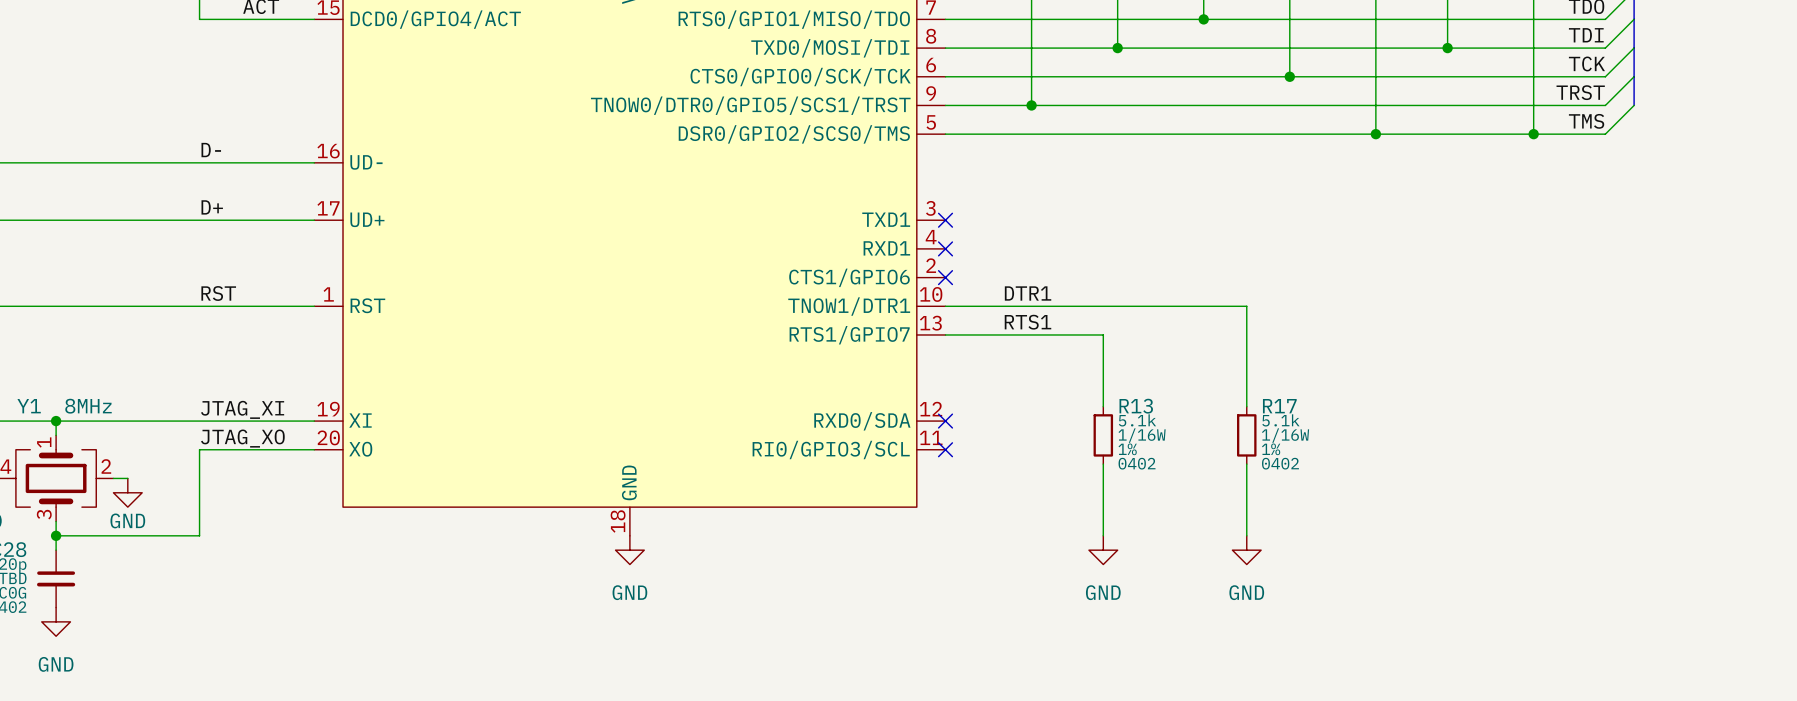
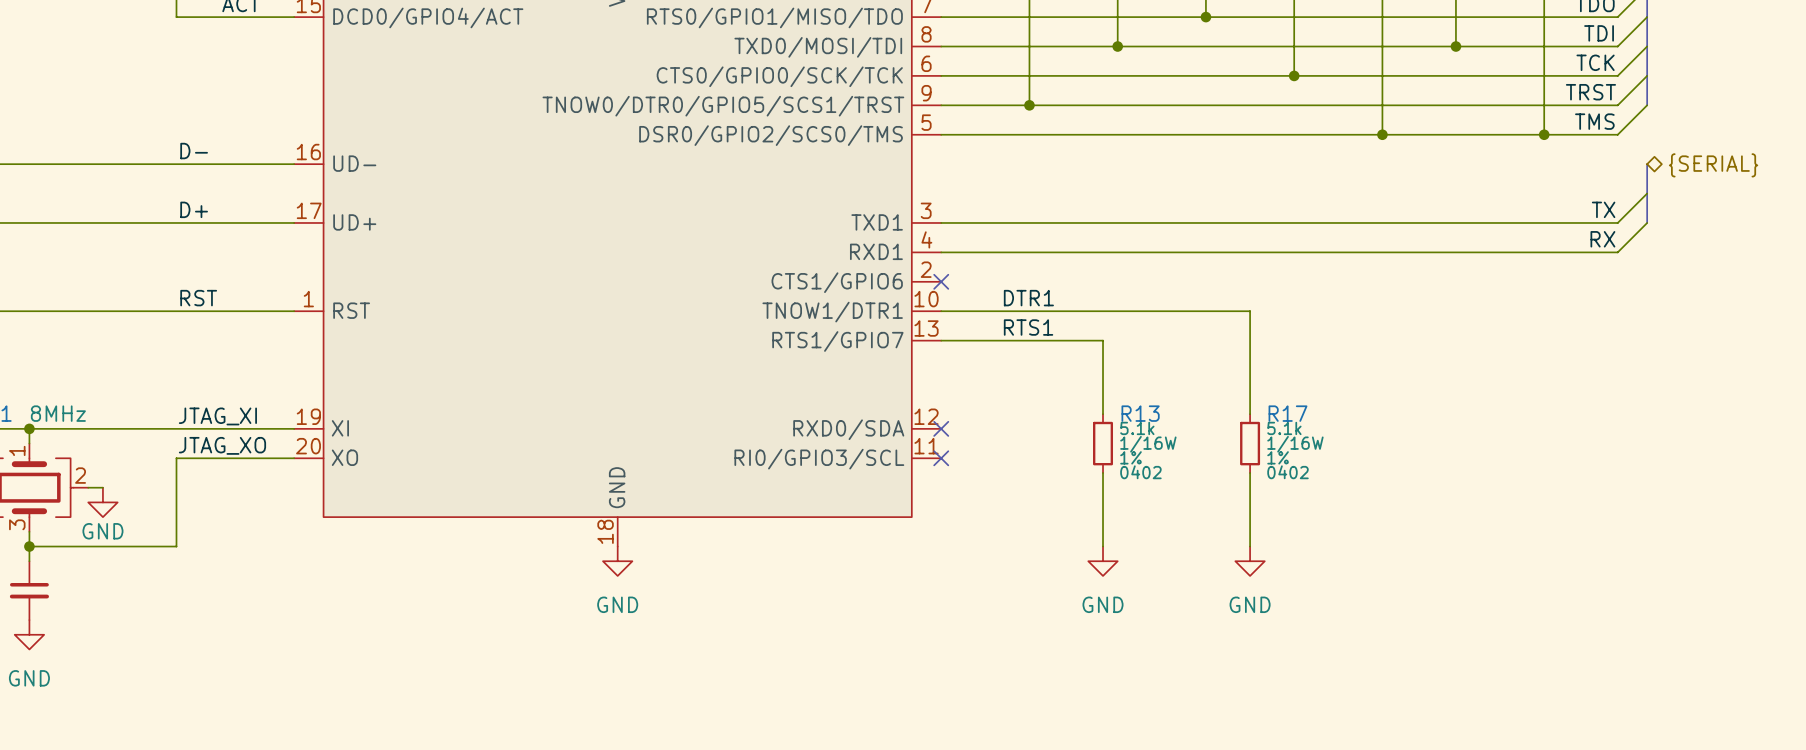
bus: none -> (1647, 164) (1647, 222)
hierarchical label: none -> {SERIAL} (1713, 165)
wire: none -> (1647, 193) (1617, 222) (941, 222)
label: none -> TX (1603, 209)
no-connect mark: (945, 220) -> none
wire: none -> (1647, 222) (1617, 252) (941, 252)
label: none -> RX (1602, 239)
no-connect mark: (945, 248) -> none

